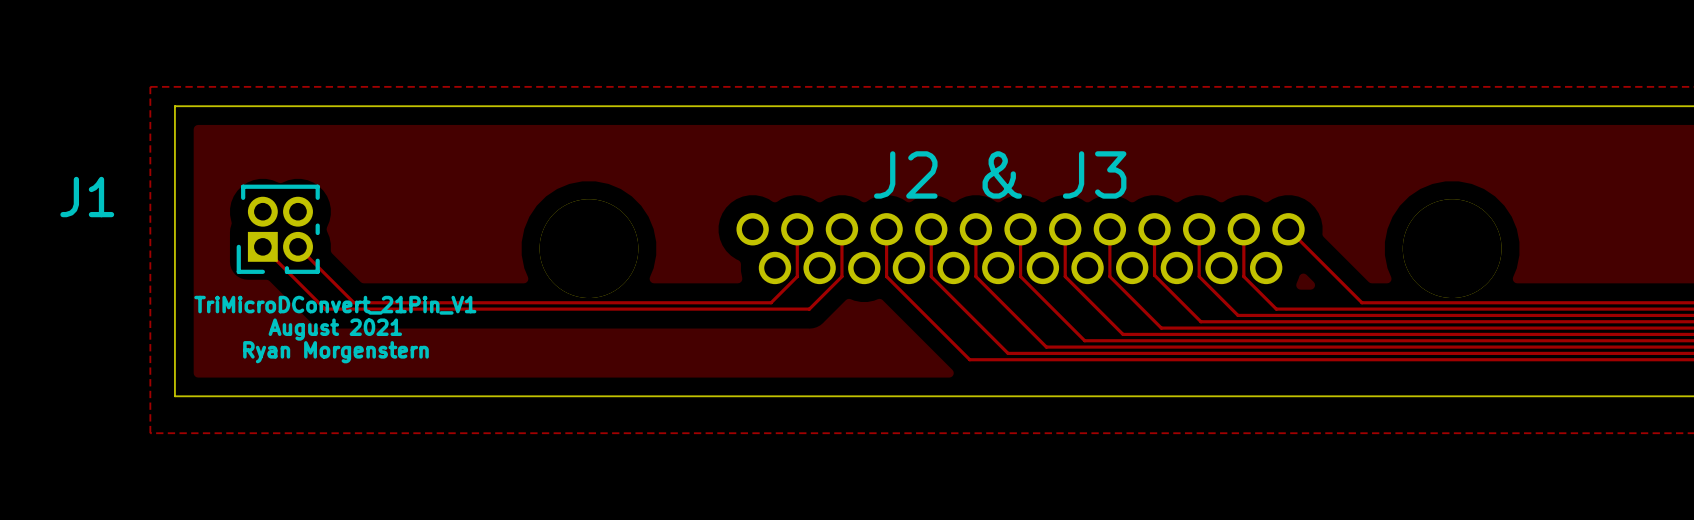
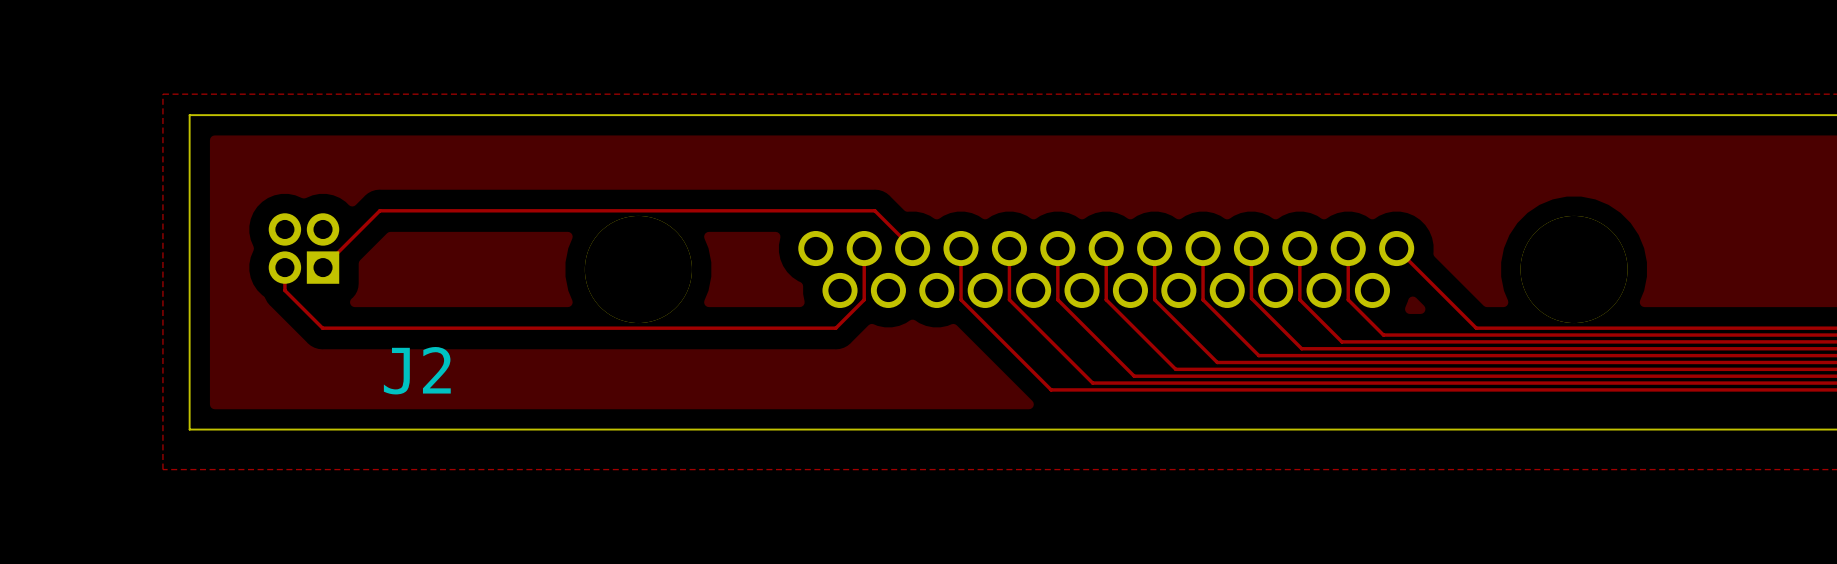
J2 & J3 name: J2 & J3 (1000, 174) -> J2 (417, 370)
J1 side: top (278, 229) -> bottom (303, 248)
track: (841, 229) (841, 276) (809, 309) (325, 309) (262, 246) -> (912, 248) (874, 210) (379, 210) (323, 267)
track: (298, 246) (353, 302) -> (284, 267) (284, 290) (322, 328) (383, 328)
text: TriMicroDConvert_21Pin_V1 (335, 305) -> none
text: August 2021 (335, 329) -> none
text: Ryan Morgenstern (335, 352) -> none

